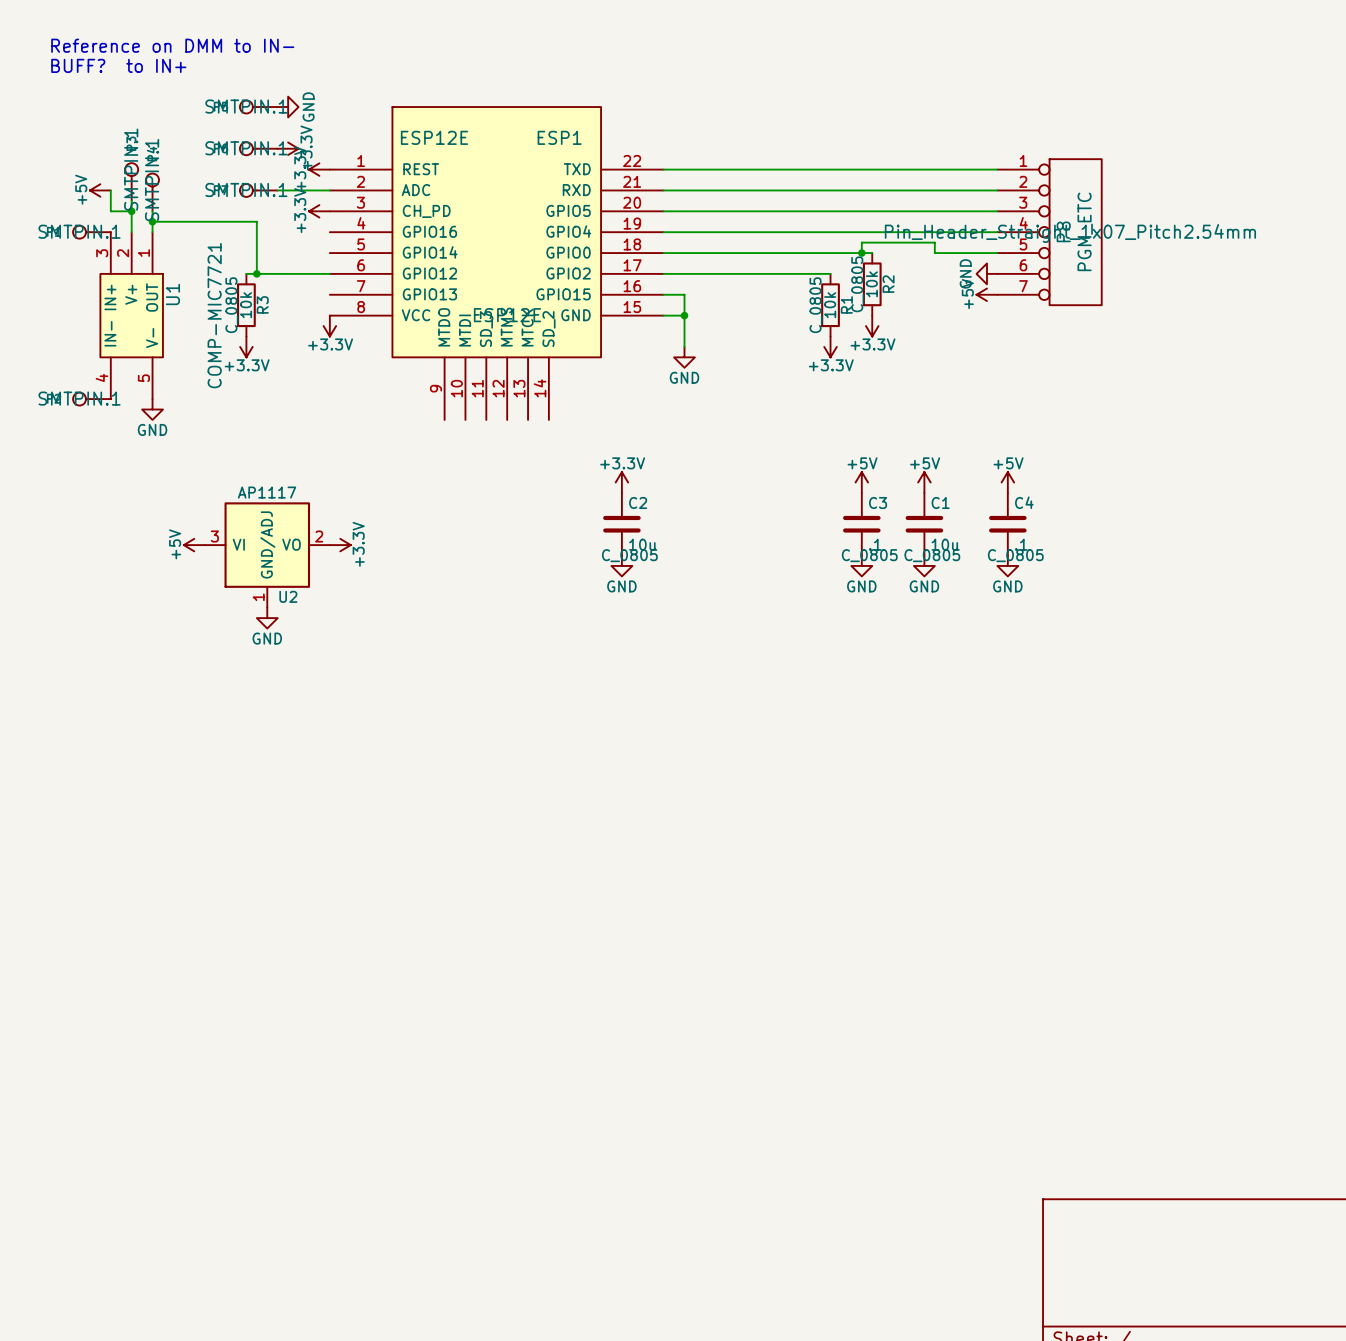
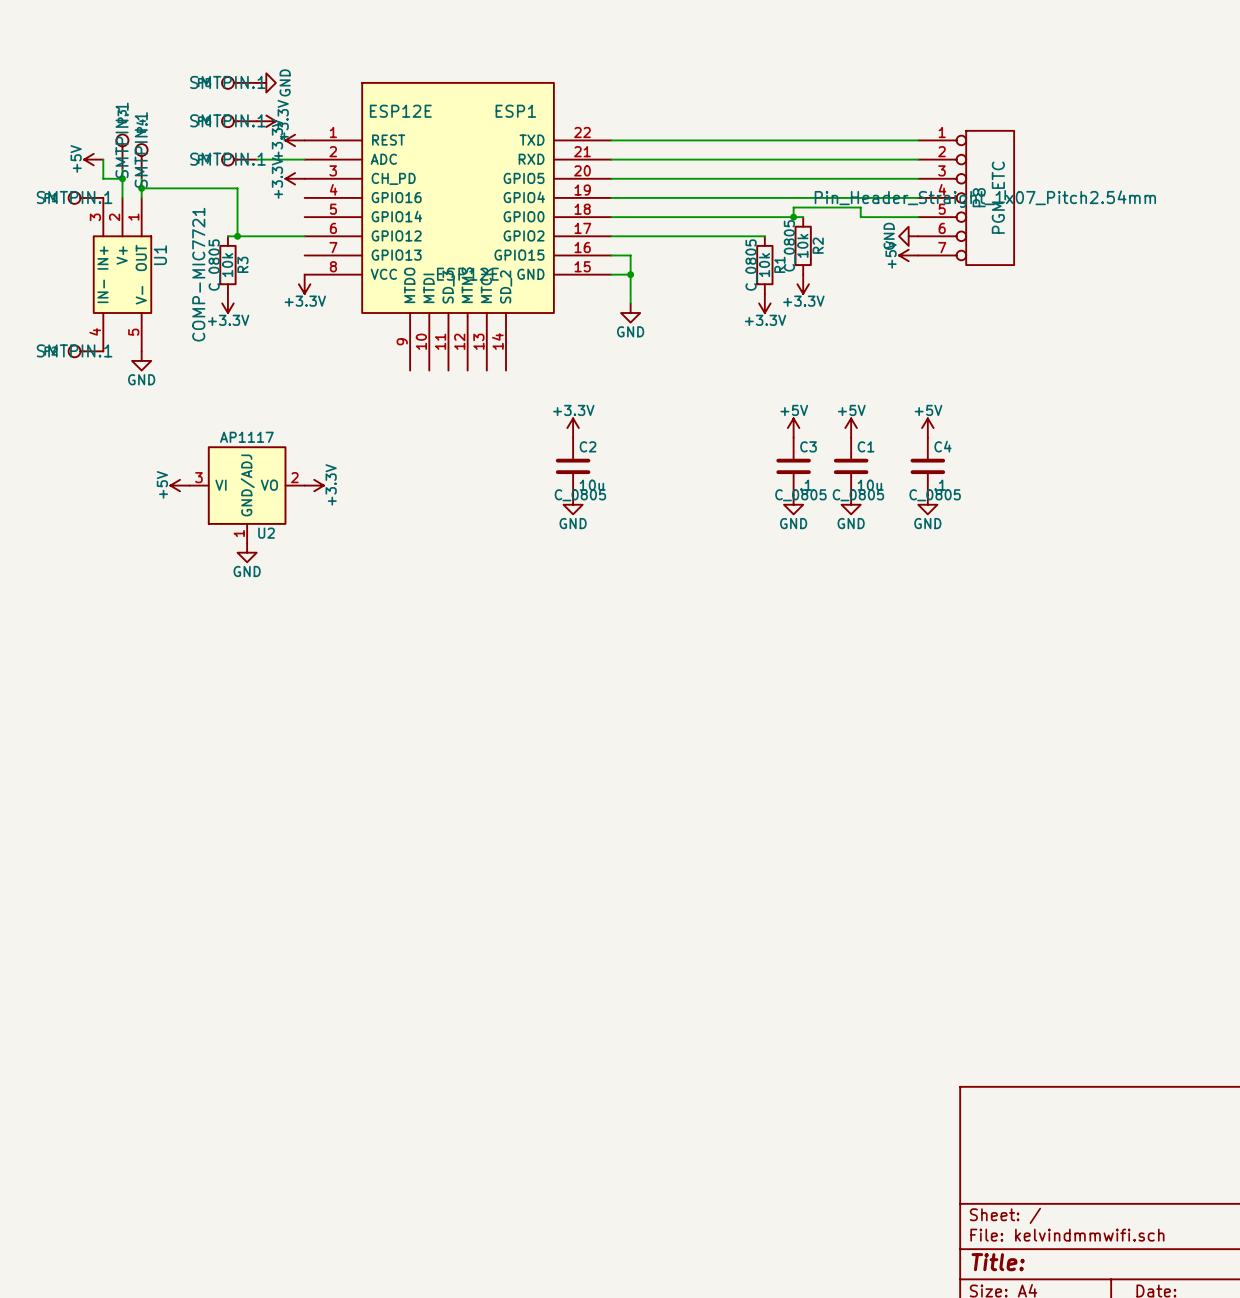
text: Reference on DMM to IN- (172, 45) -> none
text: BUFF? to IN+ (118, 65) -> none

